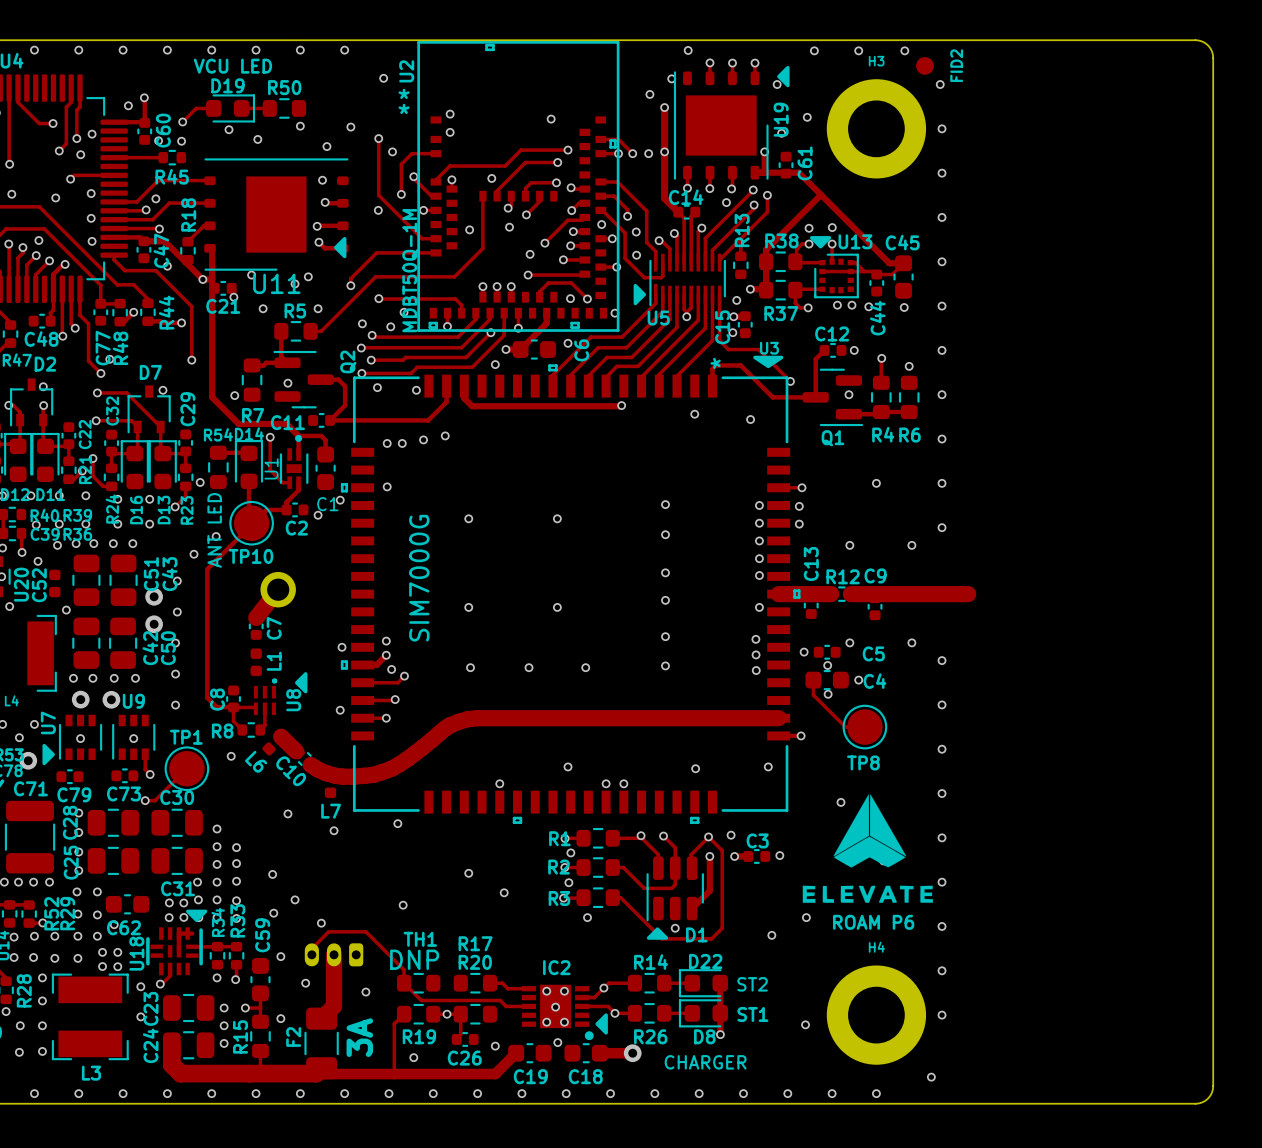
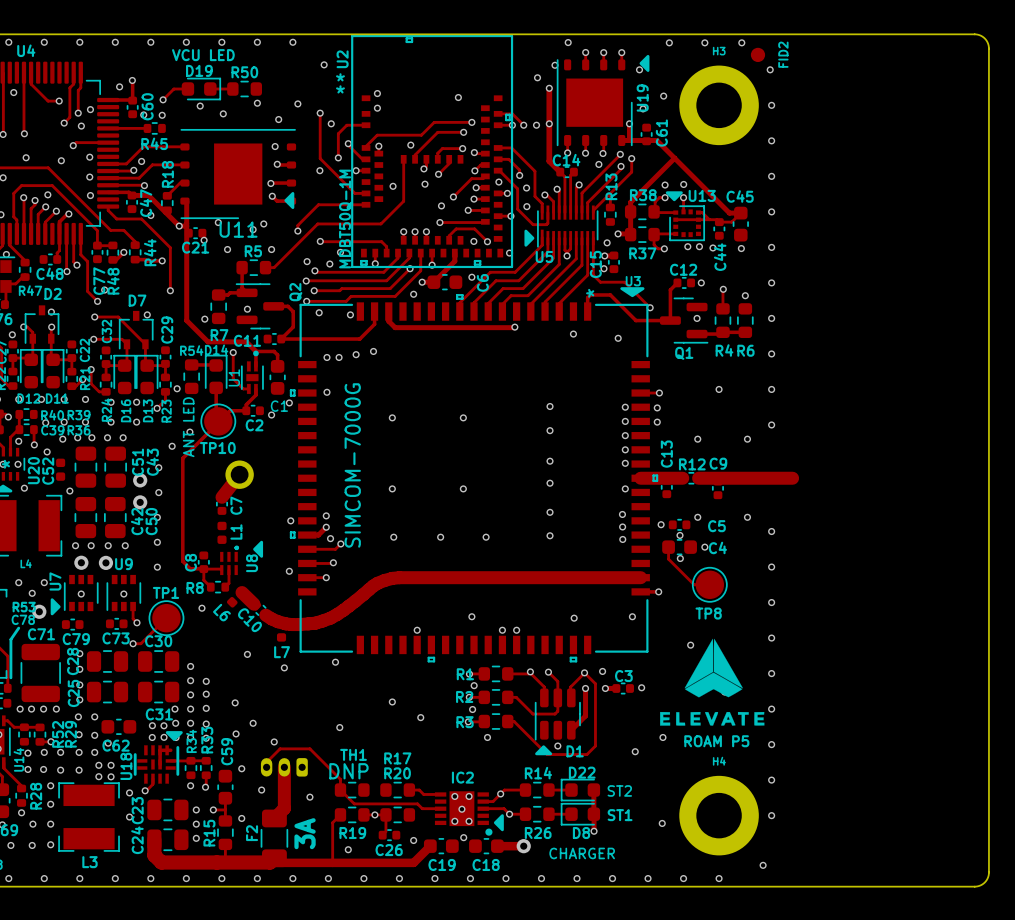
U3 value: SIM7000G (419, 578) -> SIMCOM-7000G (352, 465)
text: ROAM P6 (873, 922) -> ROAM P5 (716, 741)

